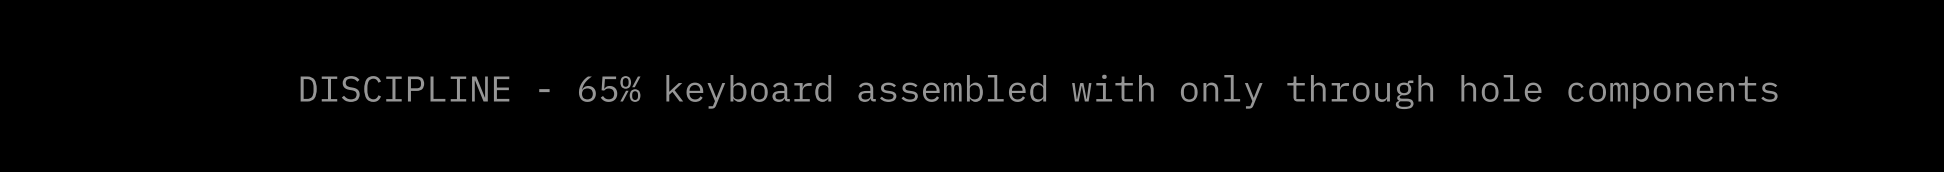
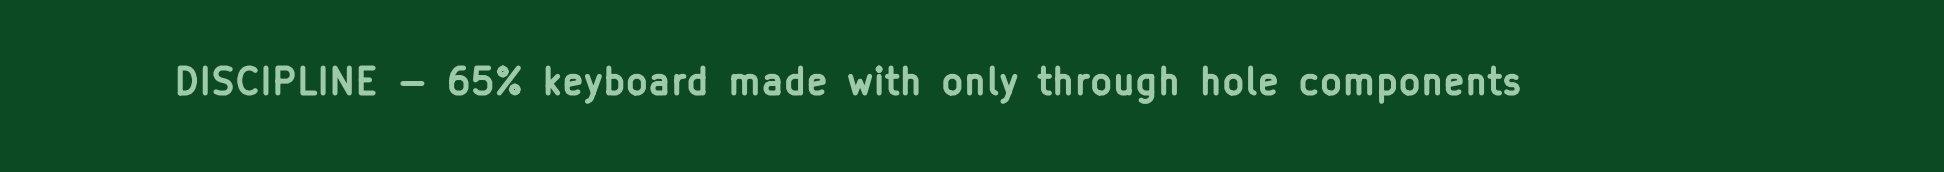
text: DISCIPLINE - 65% keyboard assembled with only through hole components (1039, 91) -> DISCIPLINE - 65% keyboard made with only through hole components (848, 84)

